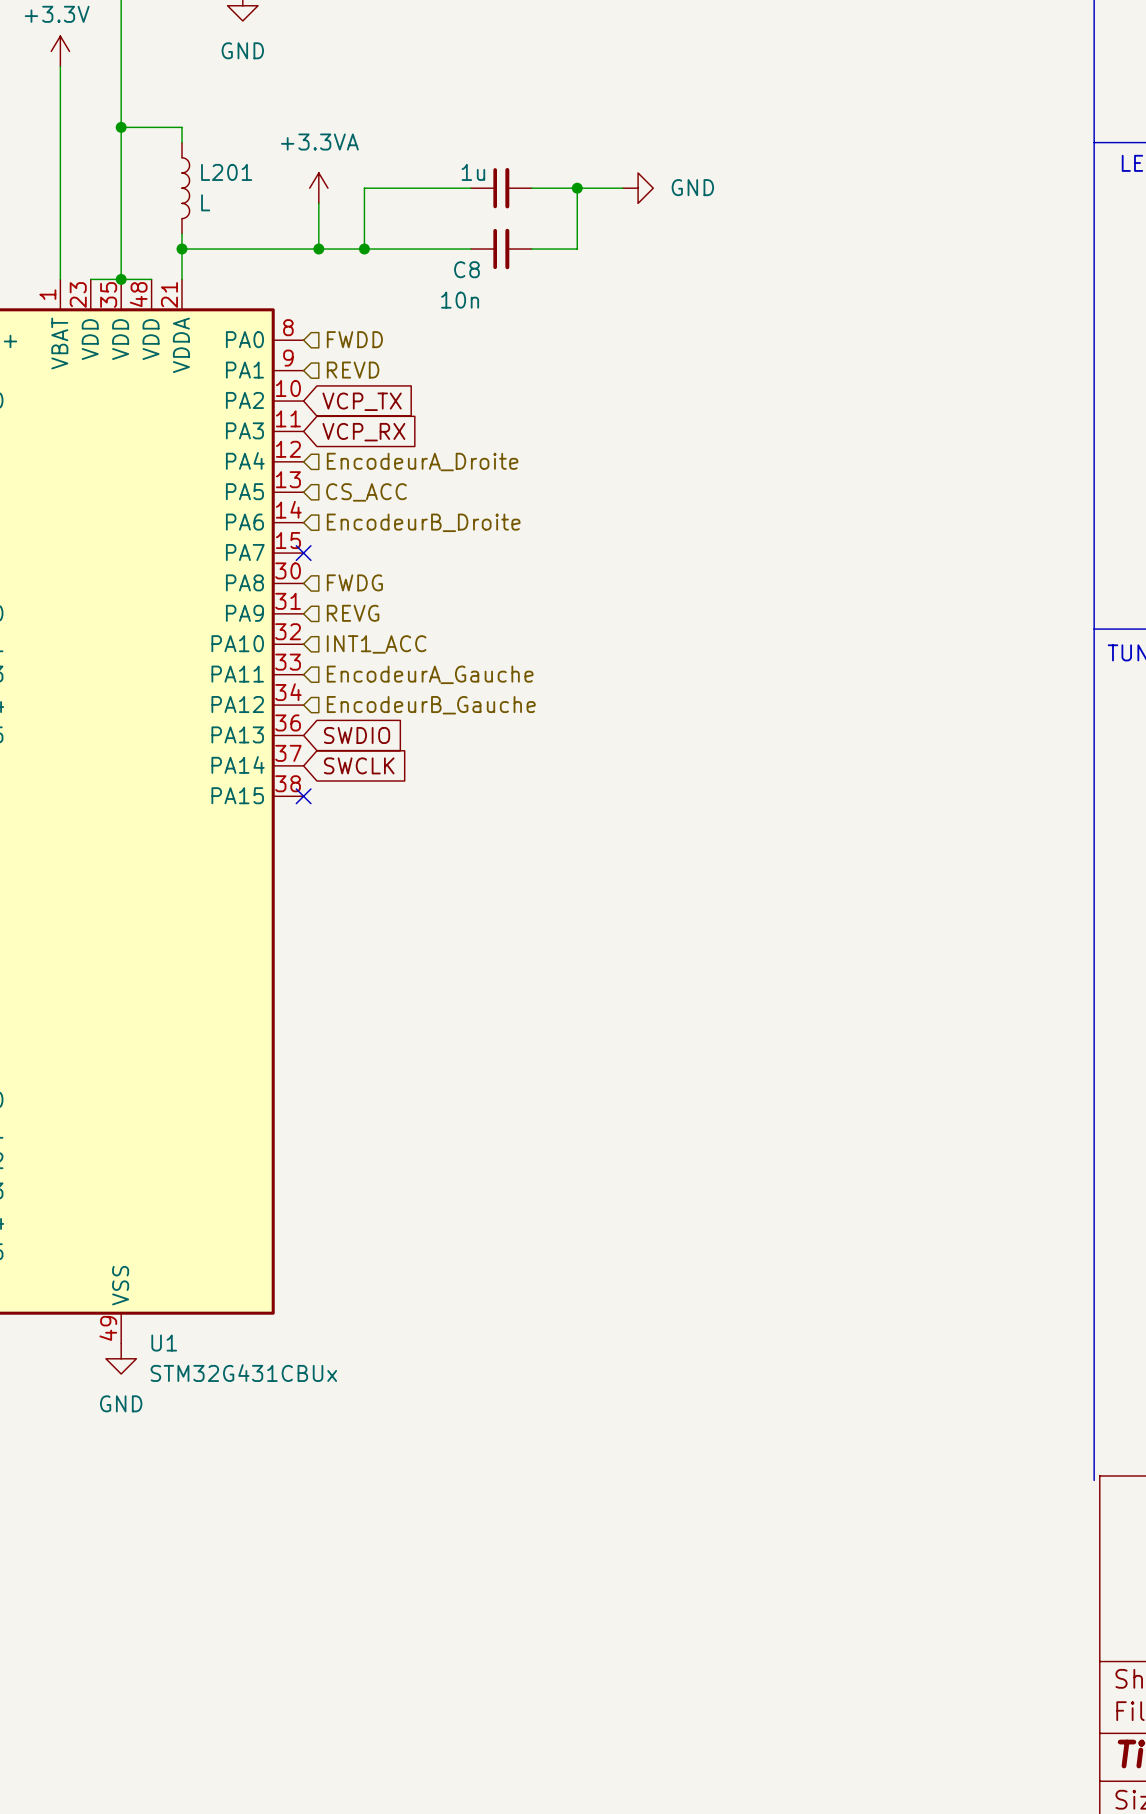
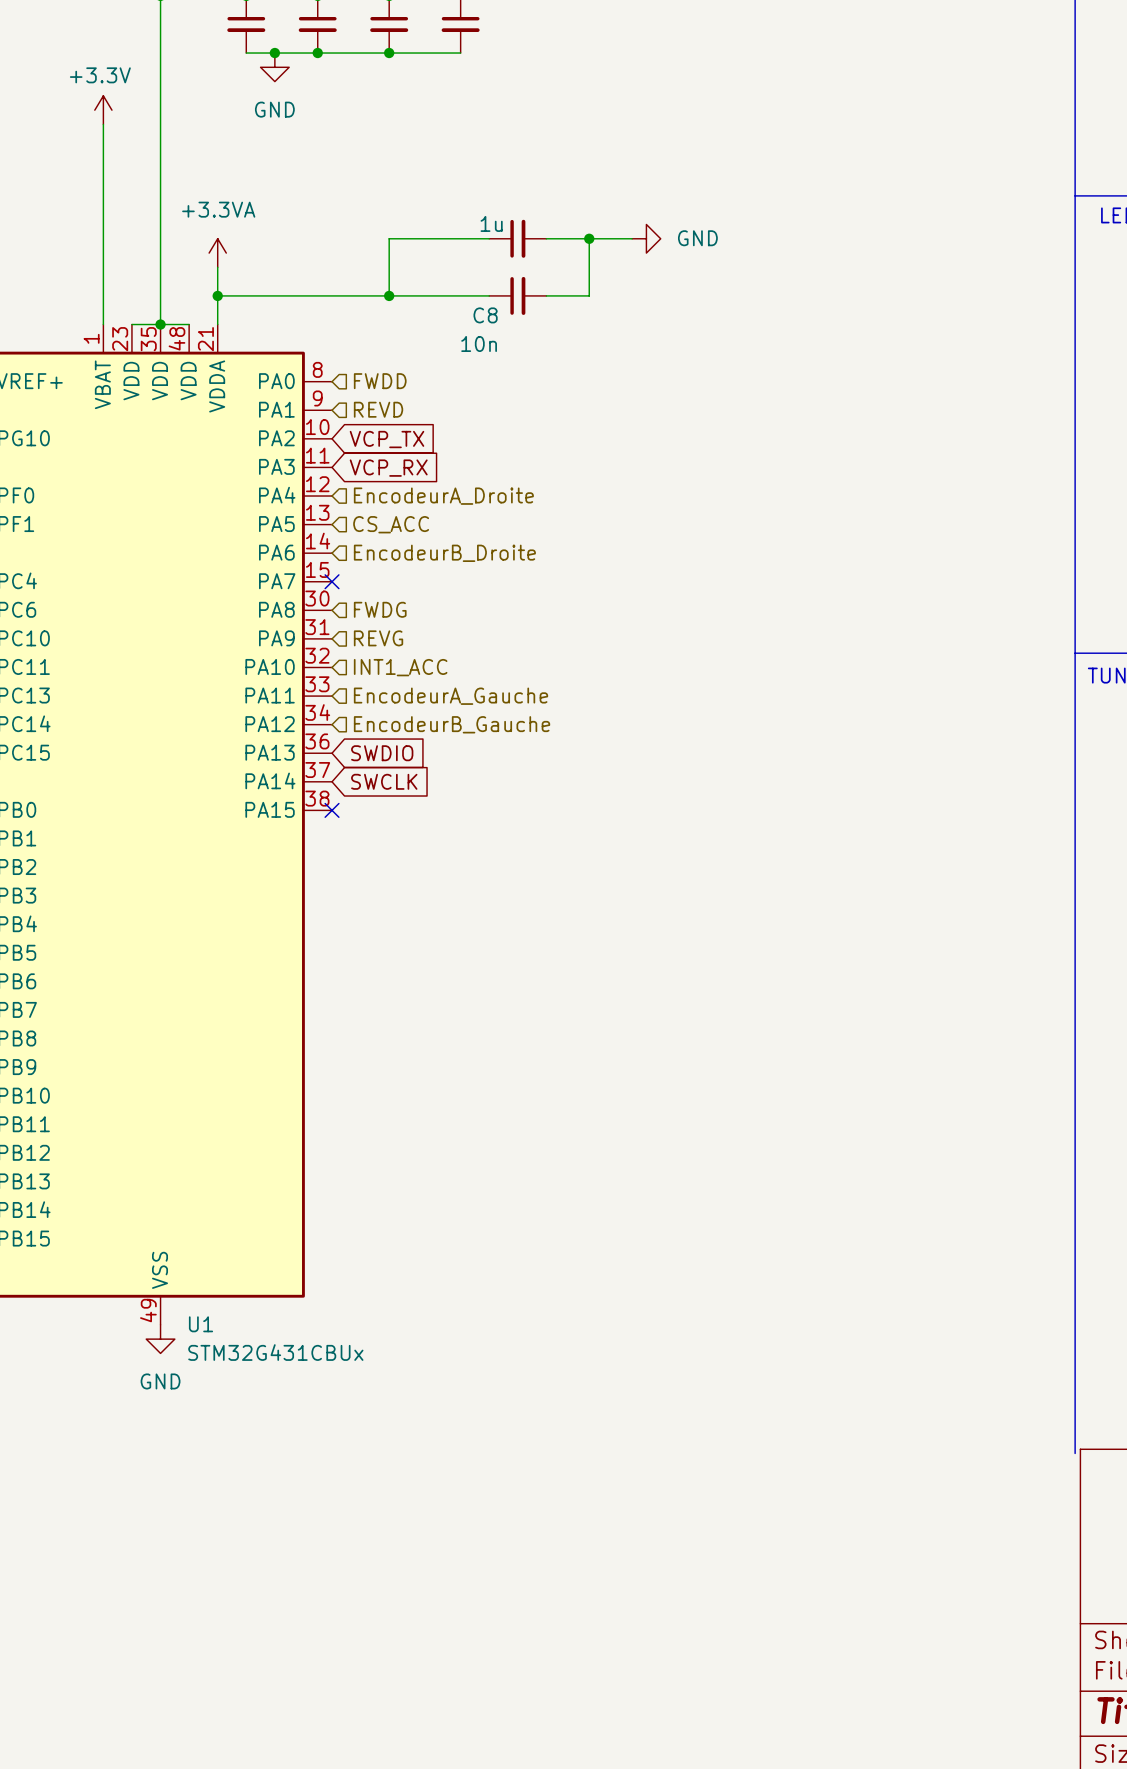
wire: (121, 127) (181, 127) (181, 142) -> none
junction: (121, 127) -> none
L201: L (185, 188) -> none
power symbol position: +3.3VA (318, 188) -> +3.3VA (217, 253)
wire: (318, 203) (318, 249) -> none
junction: (318, 249) -> none

